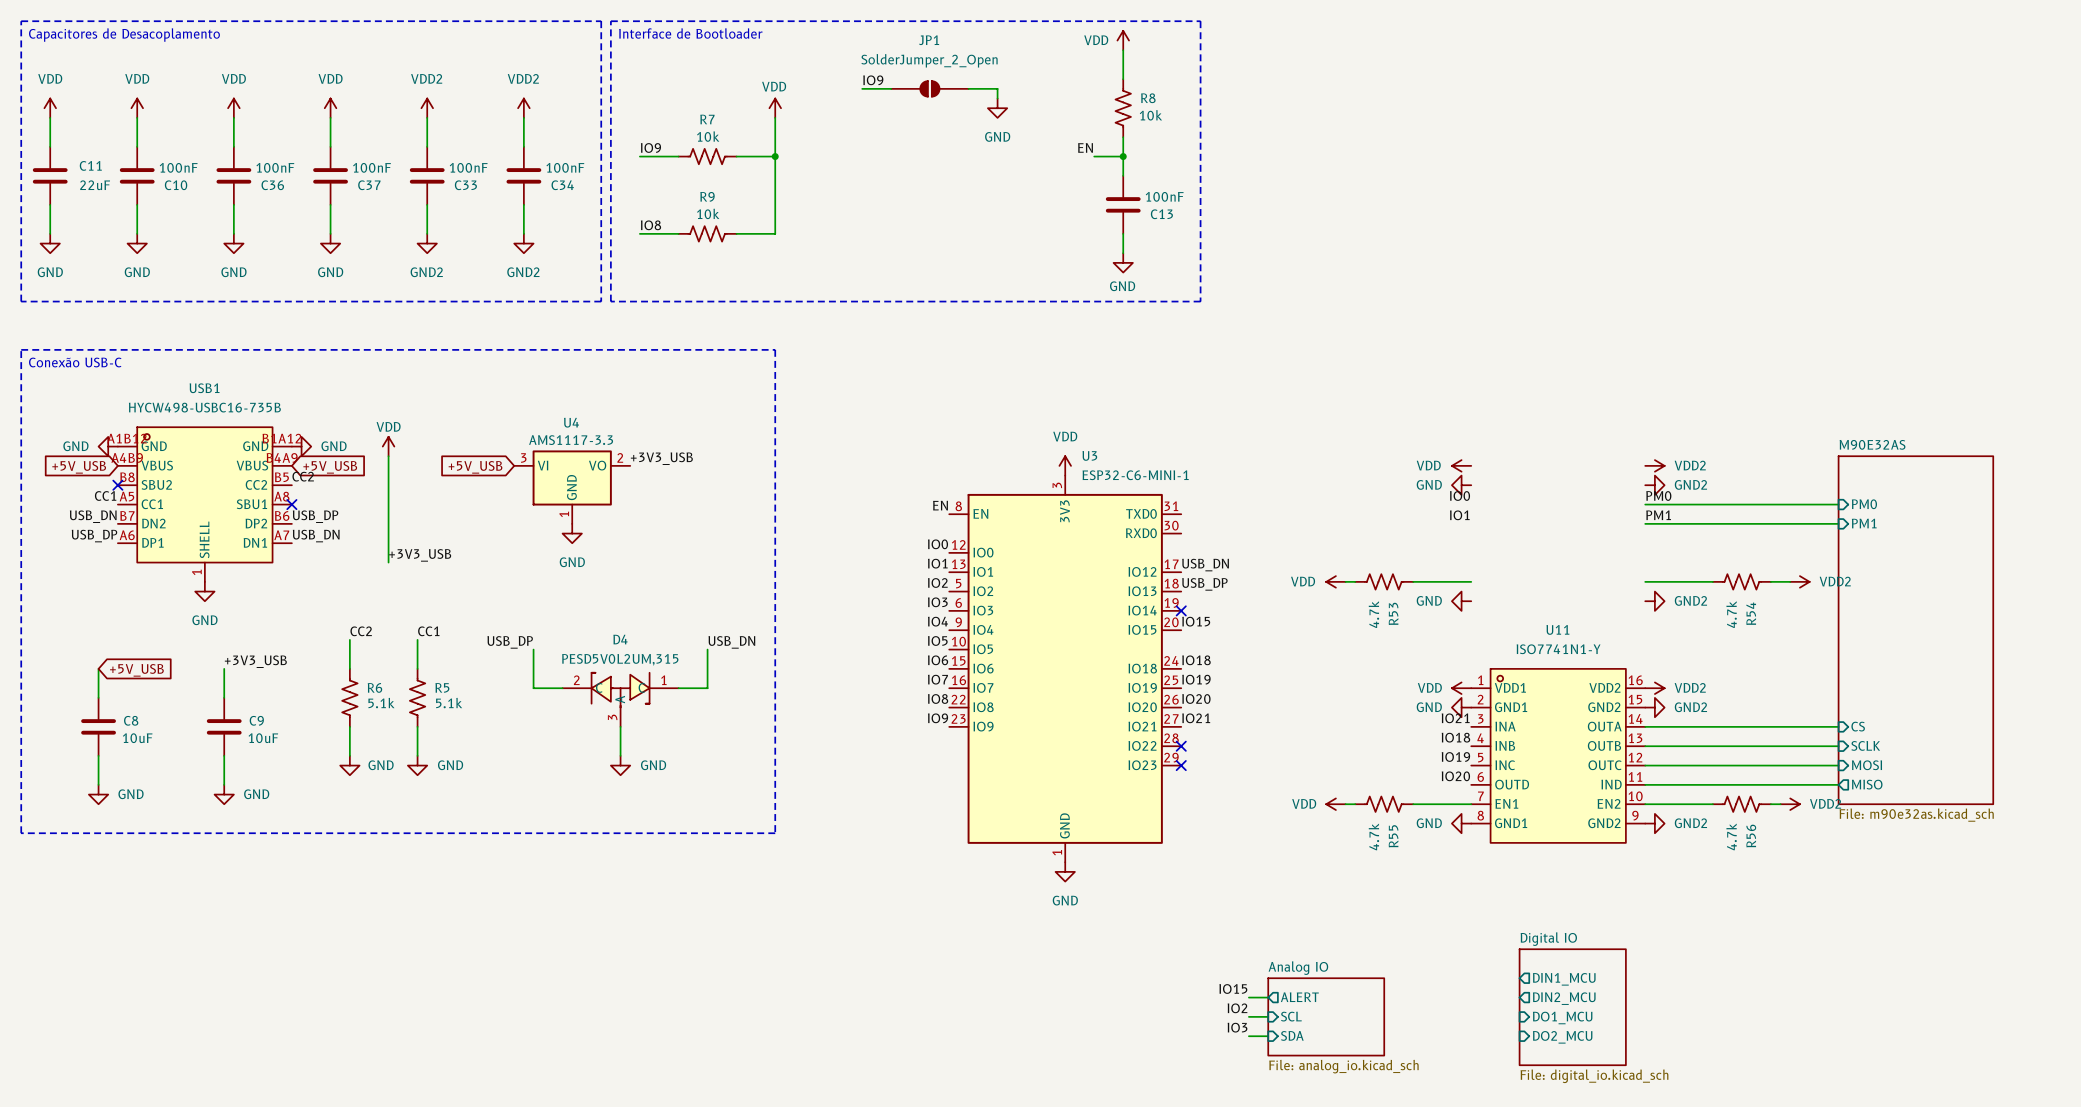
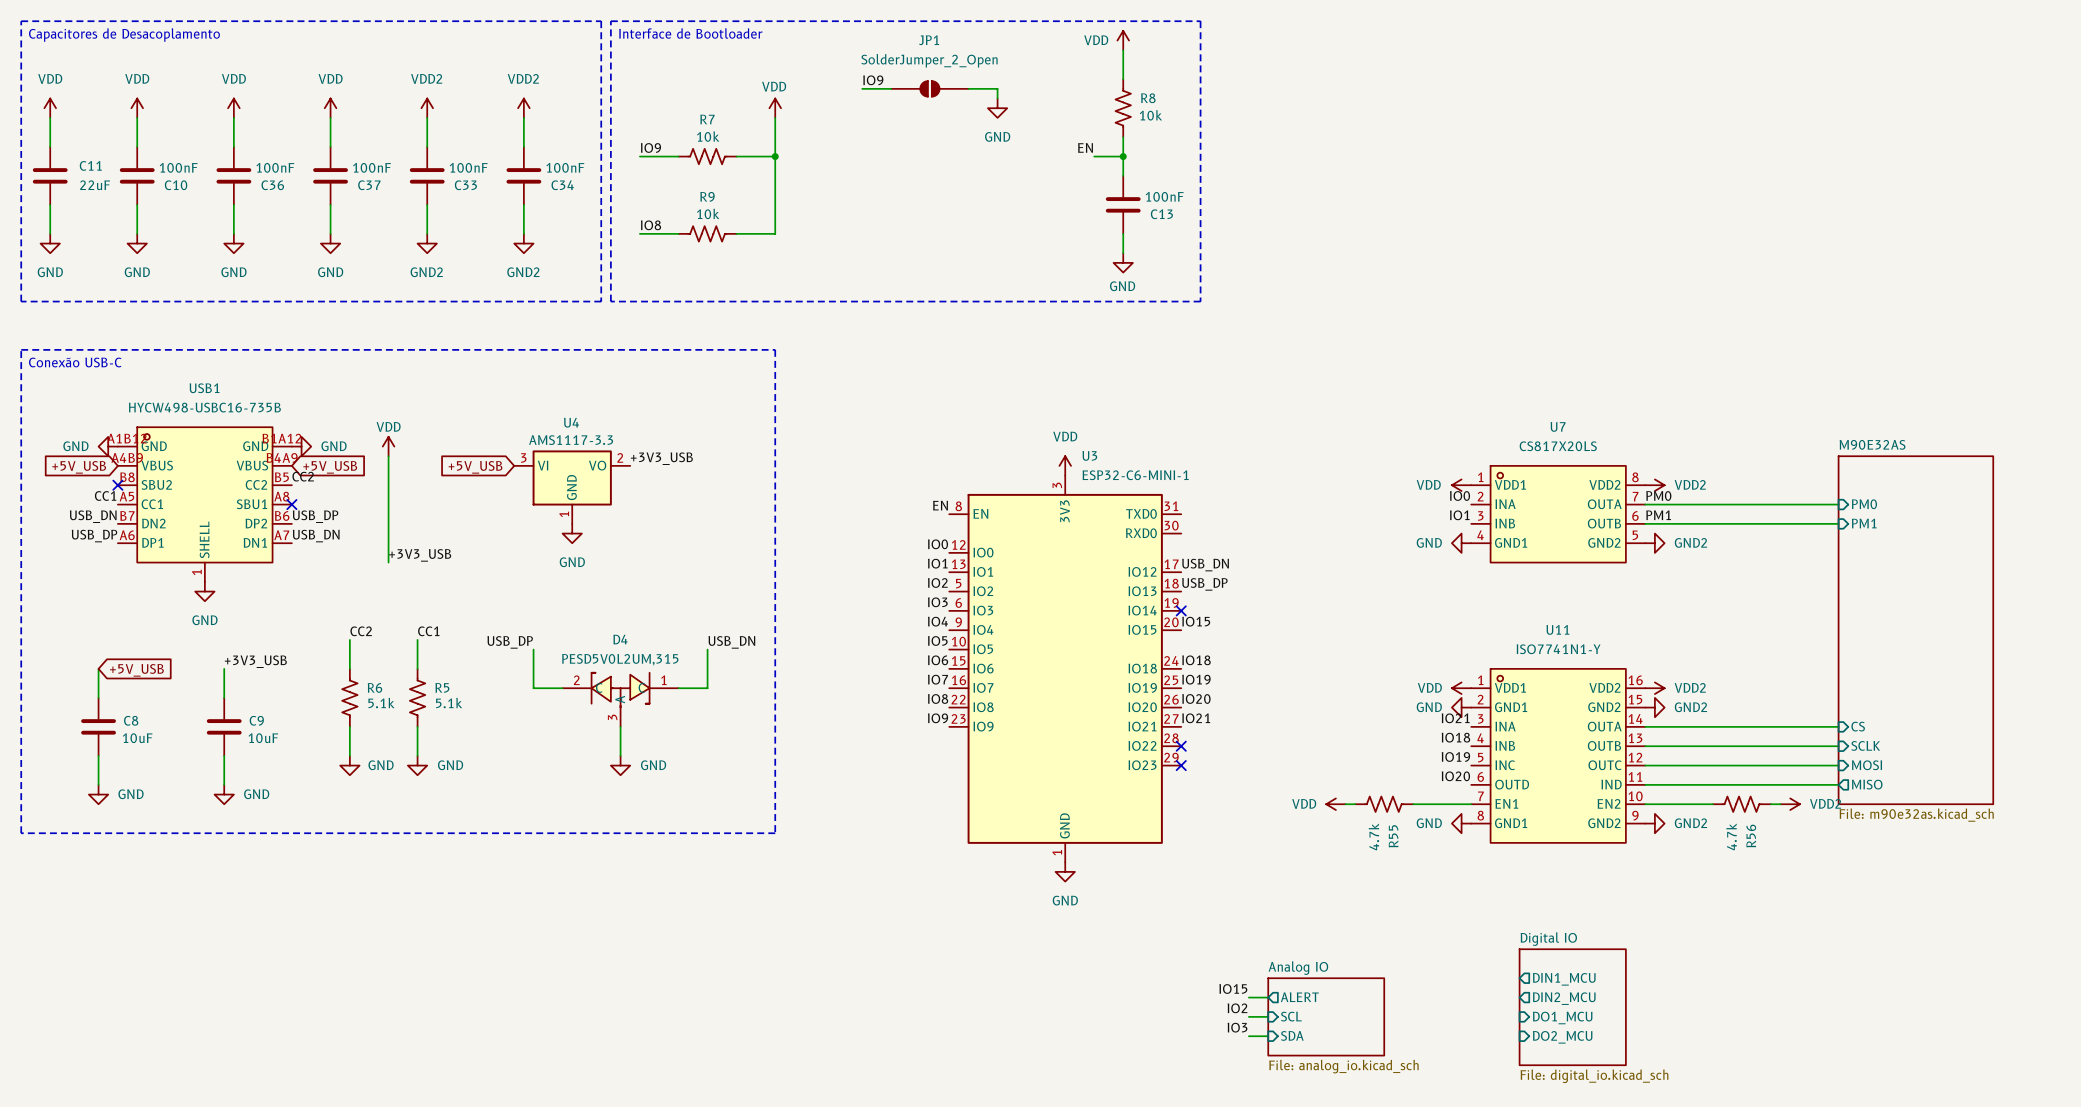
power symbol: VDD (1461, 465) -> none
power symbol: VDD2 (1654, 465) -> none
power symbol: GND (1461, 485) -> VDD (1461, 485)
power symbol: GND2 (1654, 485) -> VDD2 (1654, 485)
U7: none -> CS817X20LS (1558, 514)
power symbol: VDD (1335, 581) -> none
wire: (1345, 581) (1355, 581) -> none
R53: 4.7k (1384, 581) -> none
wire: (1413, 581) (1471, 581) -> none
wire: (1645, 581) (1712, 581) -> none
R54: 4.7k (1741, 581) -> none
wire: (1770, 581) (1790, 581) -> none
power symbol: VDD2 (1799, 581) -> none
power symbol position: GND (1461, 601) -> GND (1461, 543)
power symbol position: GND2 (1654, 601) -> GND2 (1654, 543)

